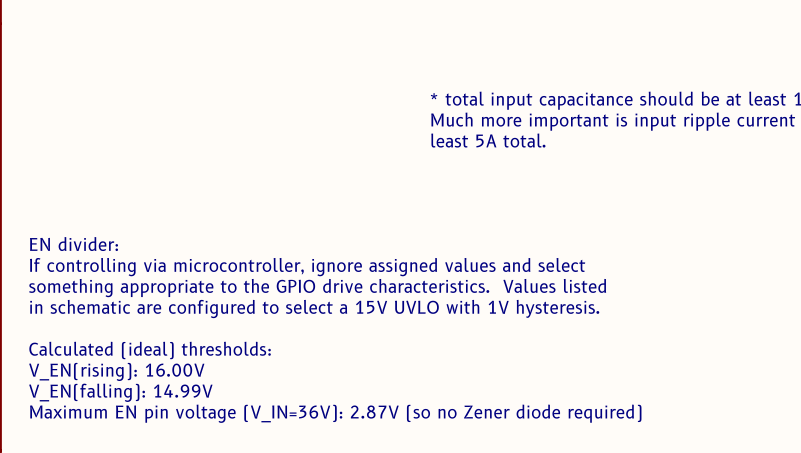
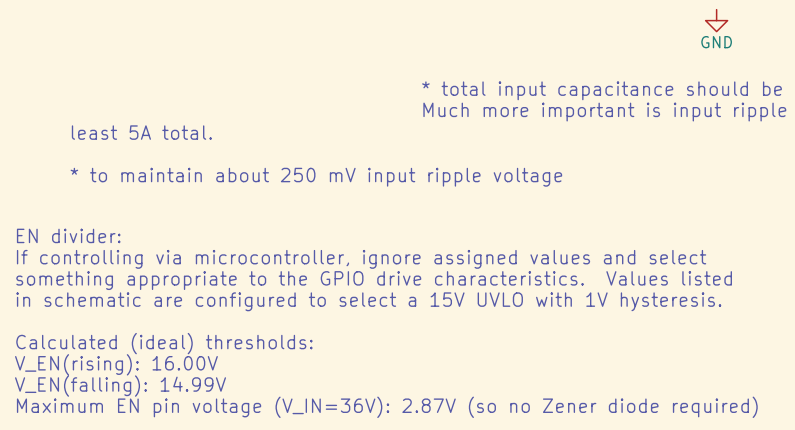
power symbol: none -> GND (716, 20)
text: least 5A total. (488, 140) -> none
text: none -> least 5A total. (141, 132)
text: none -> * to maintain about 250 mV input ripple voltage (316, 177)

